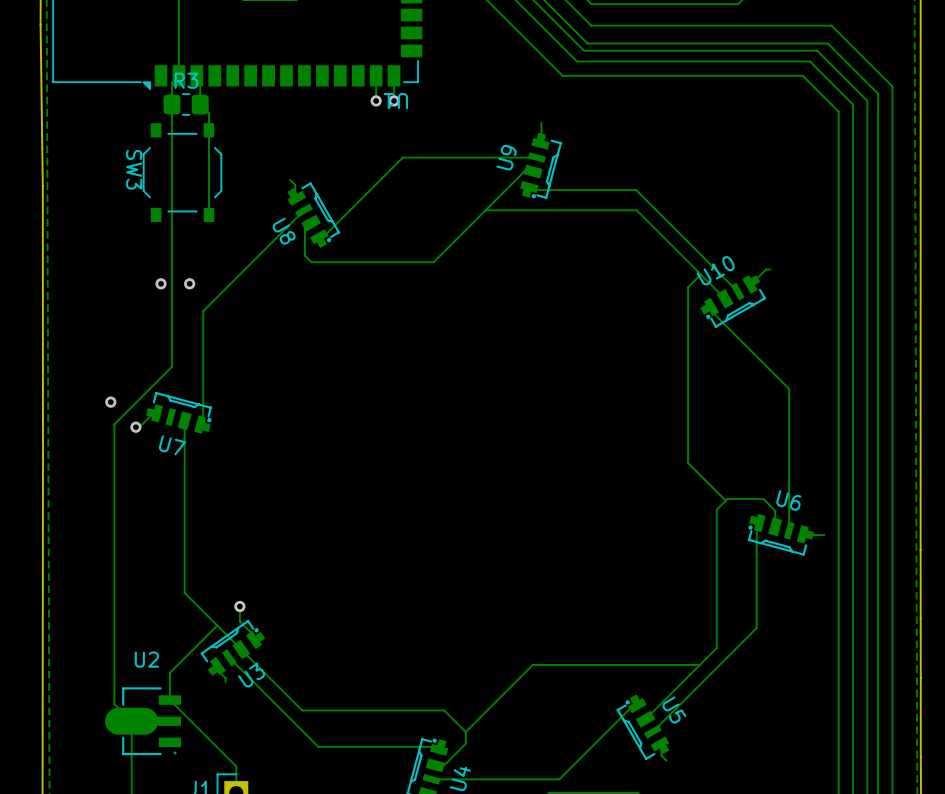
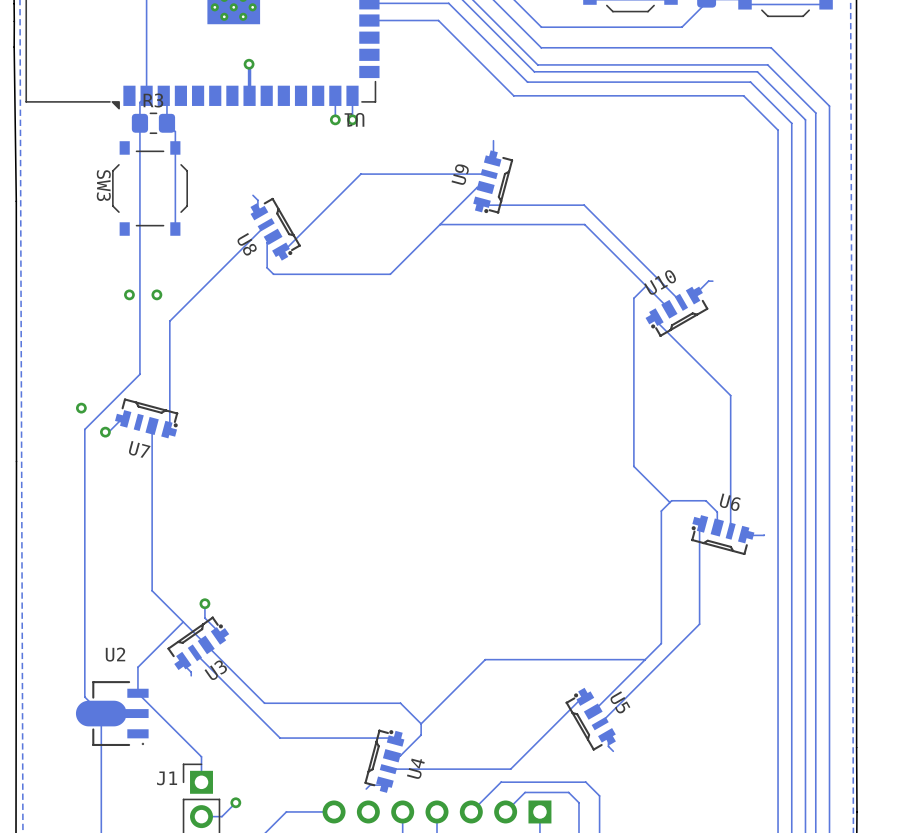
track: none -> (249, 64) (249, 95)
via: none -> (249, 64)

